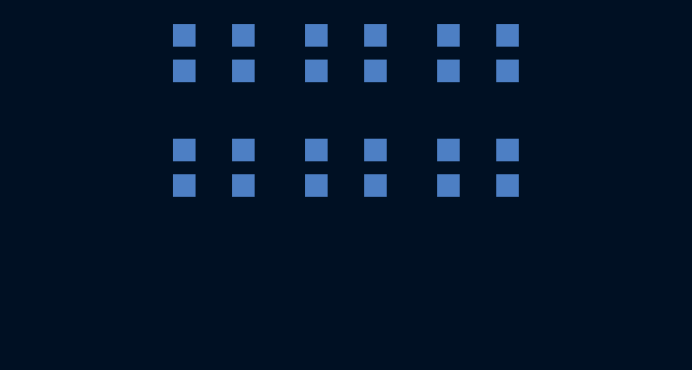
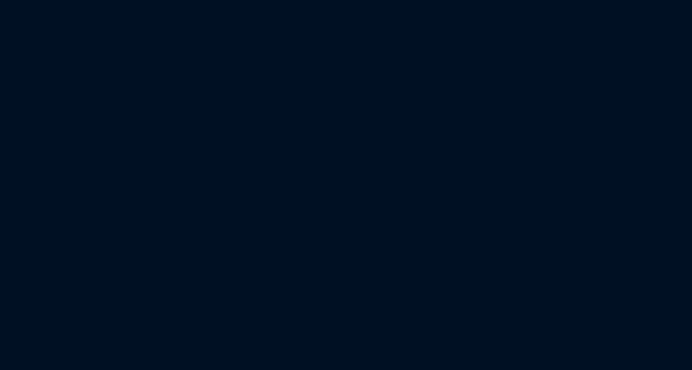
part: (213, 53) -> none
part: (345, 53) -> none
part: (477, 53) -> none
part: (213, 167) -> none
part: (345, 167) -> none
part: (477, 167) -> none

